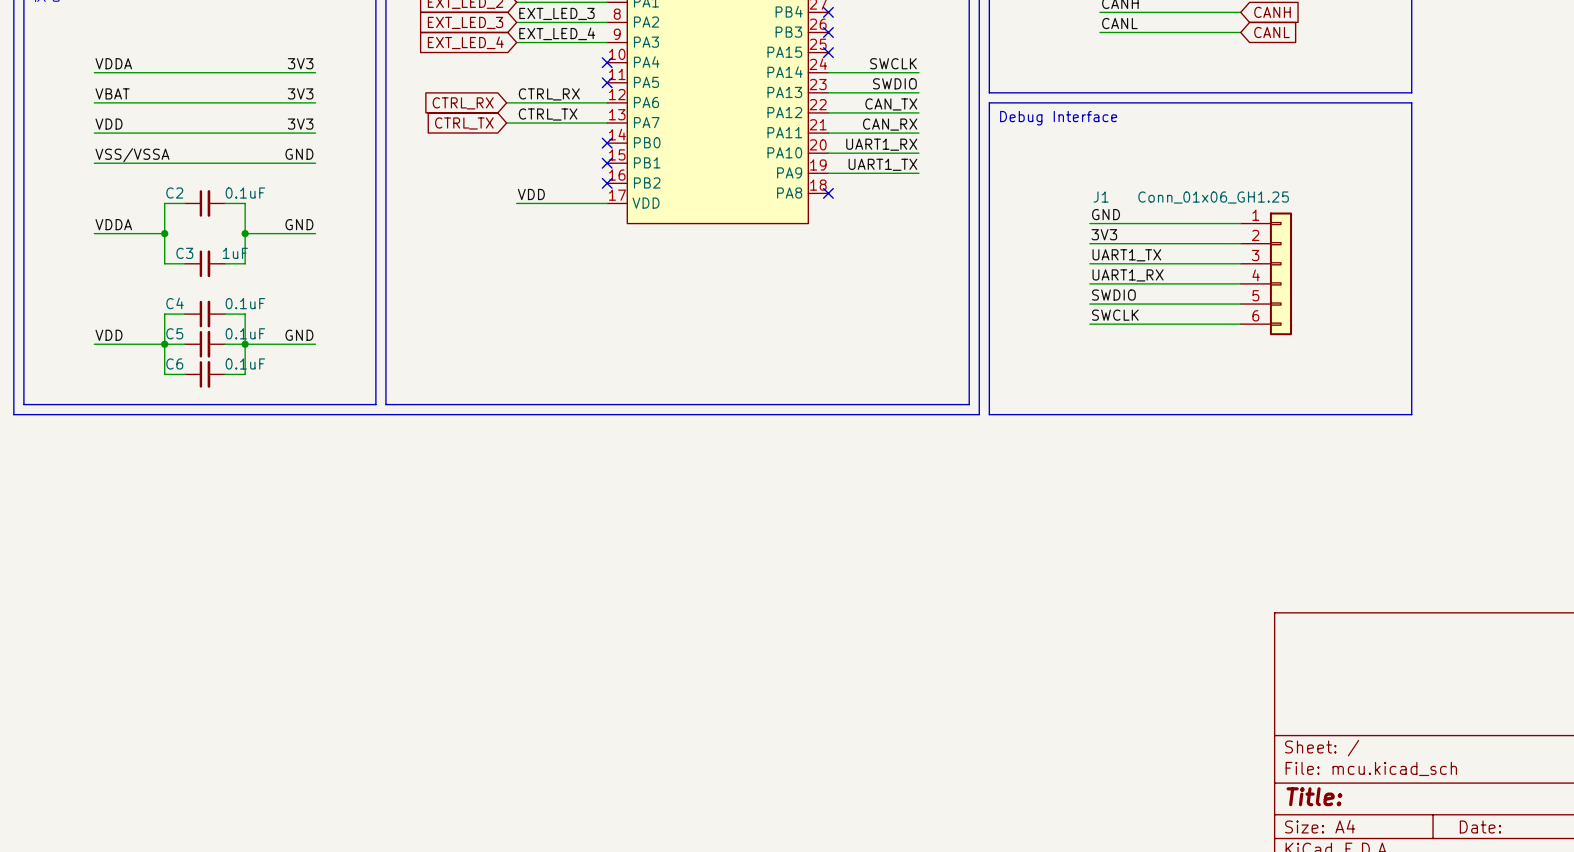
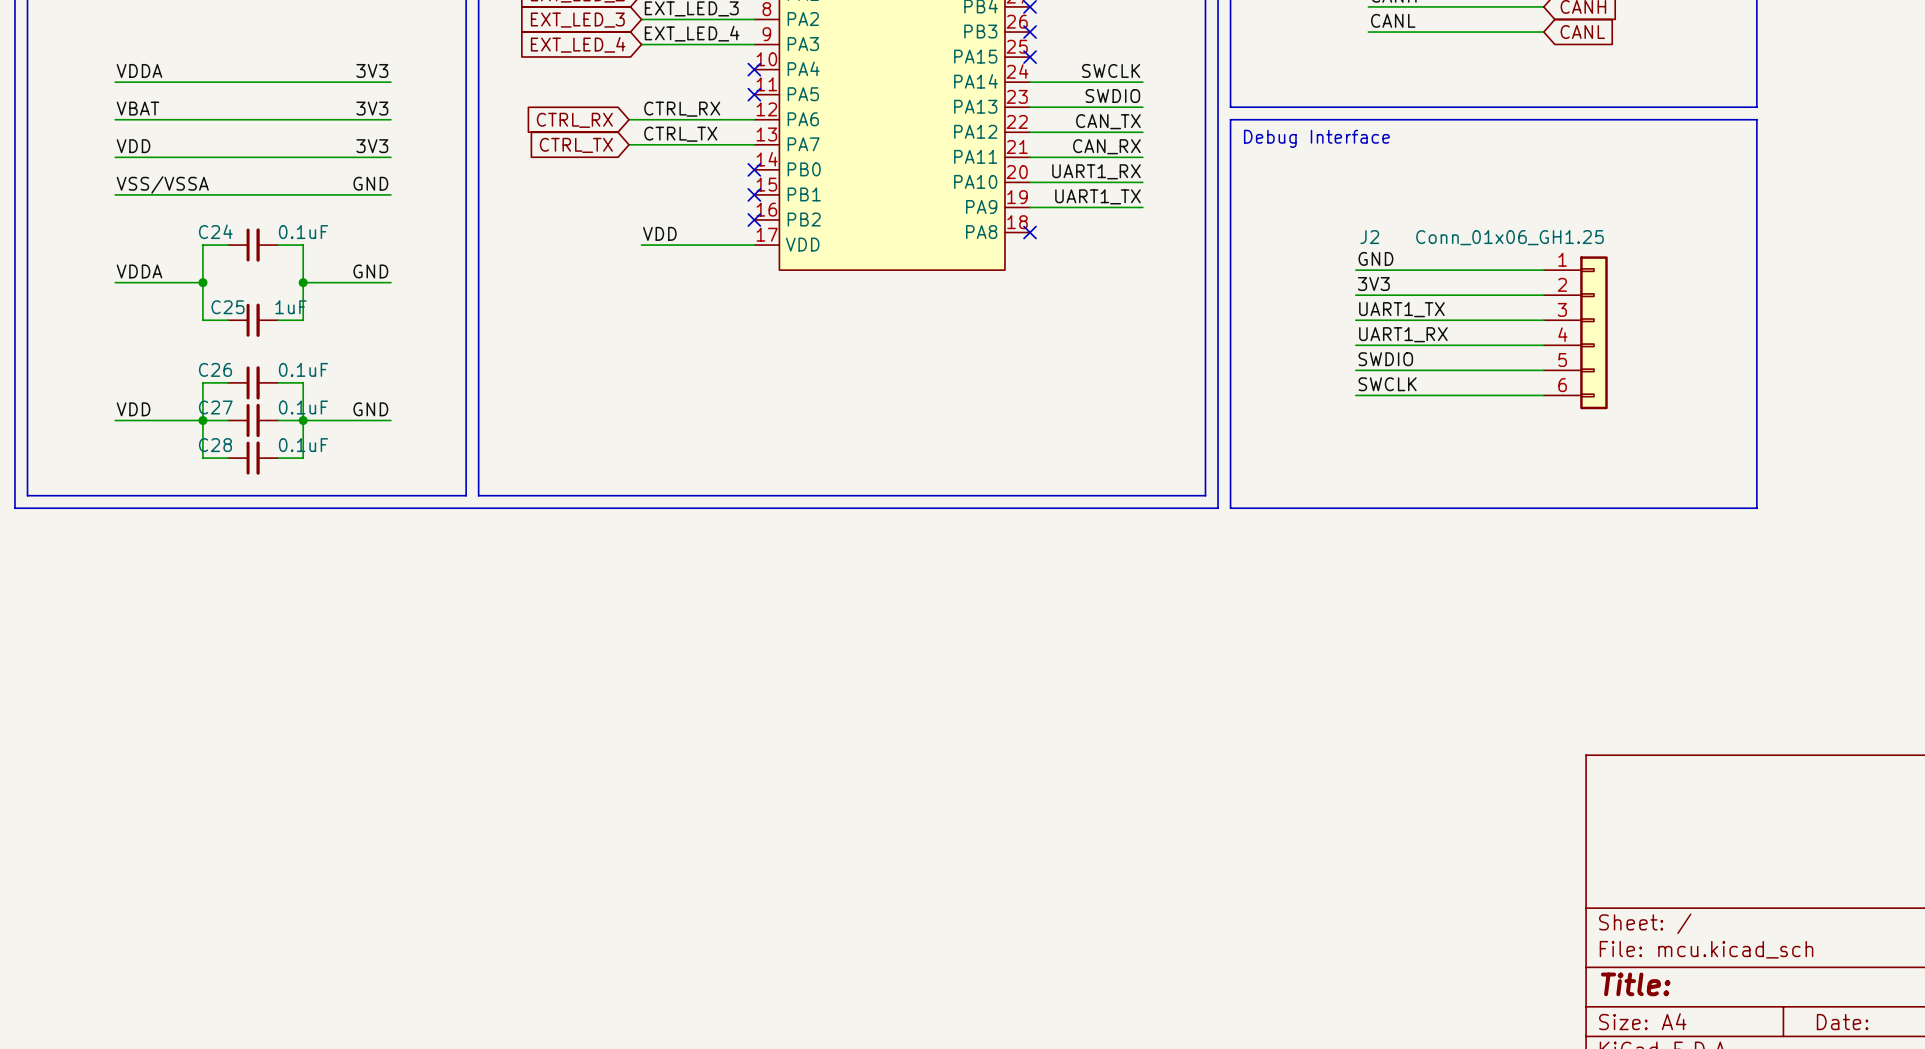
C2 name: C2 (174, 193) -> C24 (215, 231)
J1 name: J1 (1101, 197) -> J2 (1369, 237)
C3 name: C3 (184, 253) -> C25 (228, 307)
C4 name: C4 (175, 303) -> C26 (215, 369)
C5 name: C5 (174, 333) -> C27 (215, 407)
C6 name: C6 (174, 363) -> C28 (215, 445)

